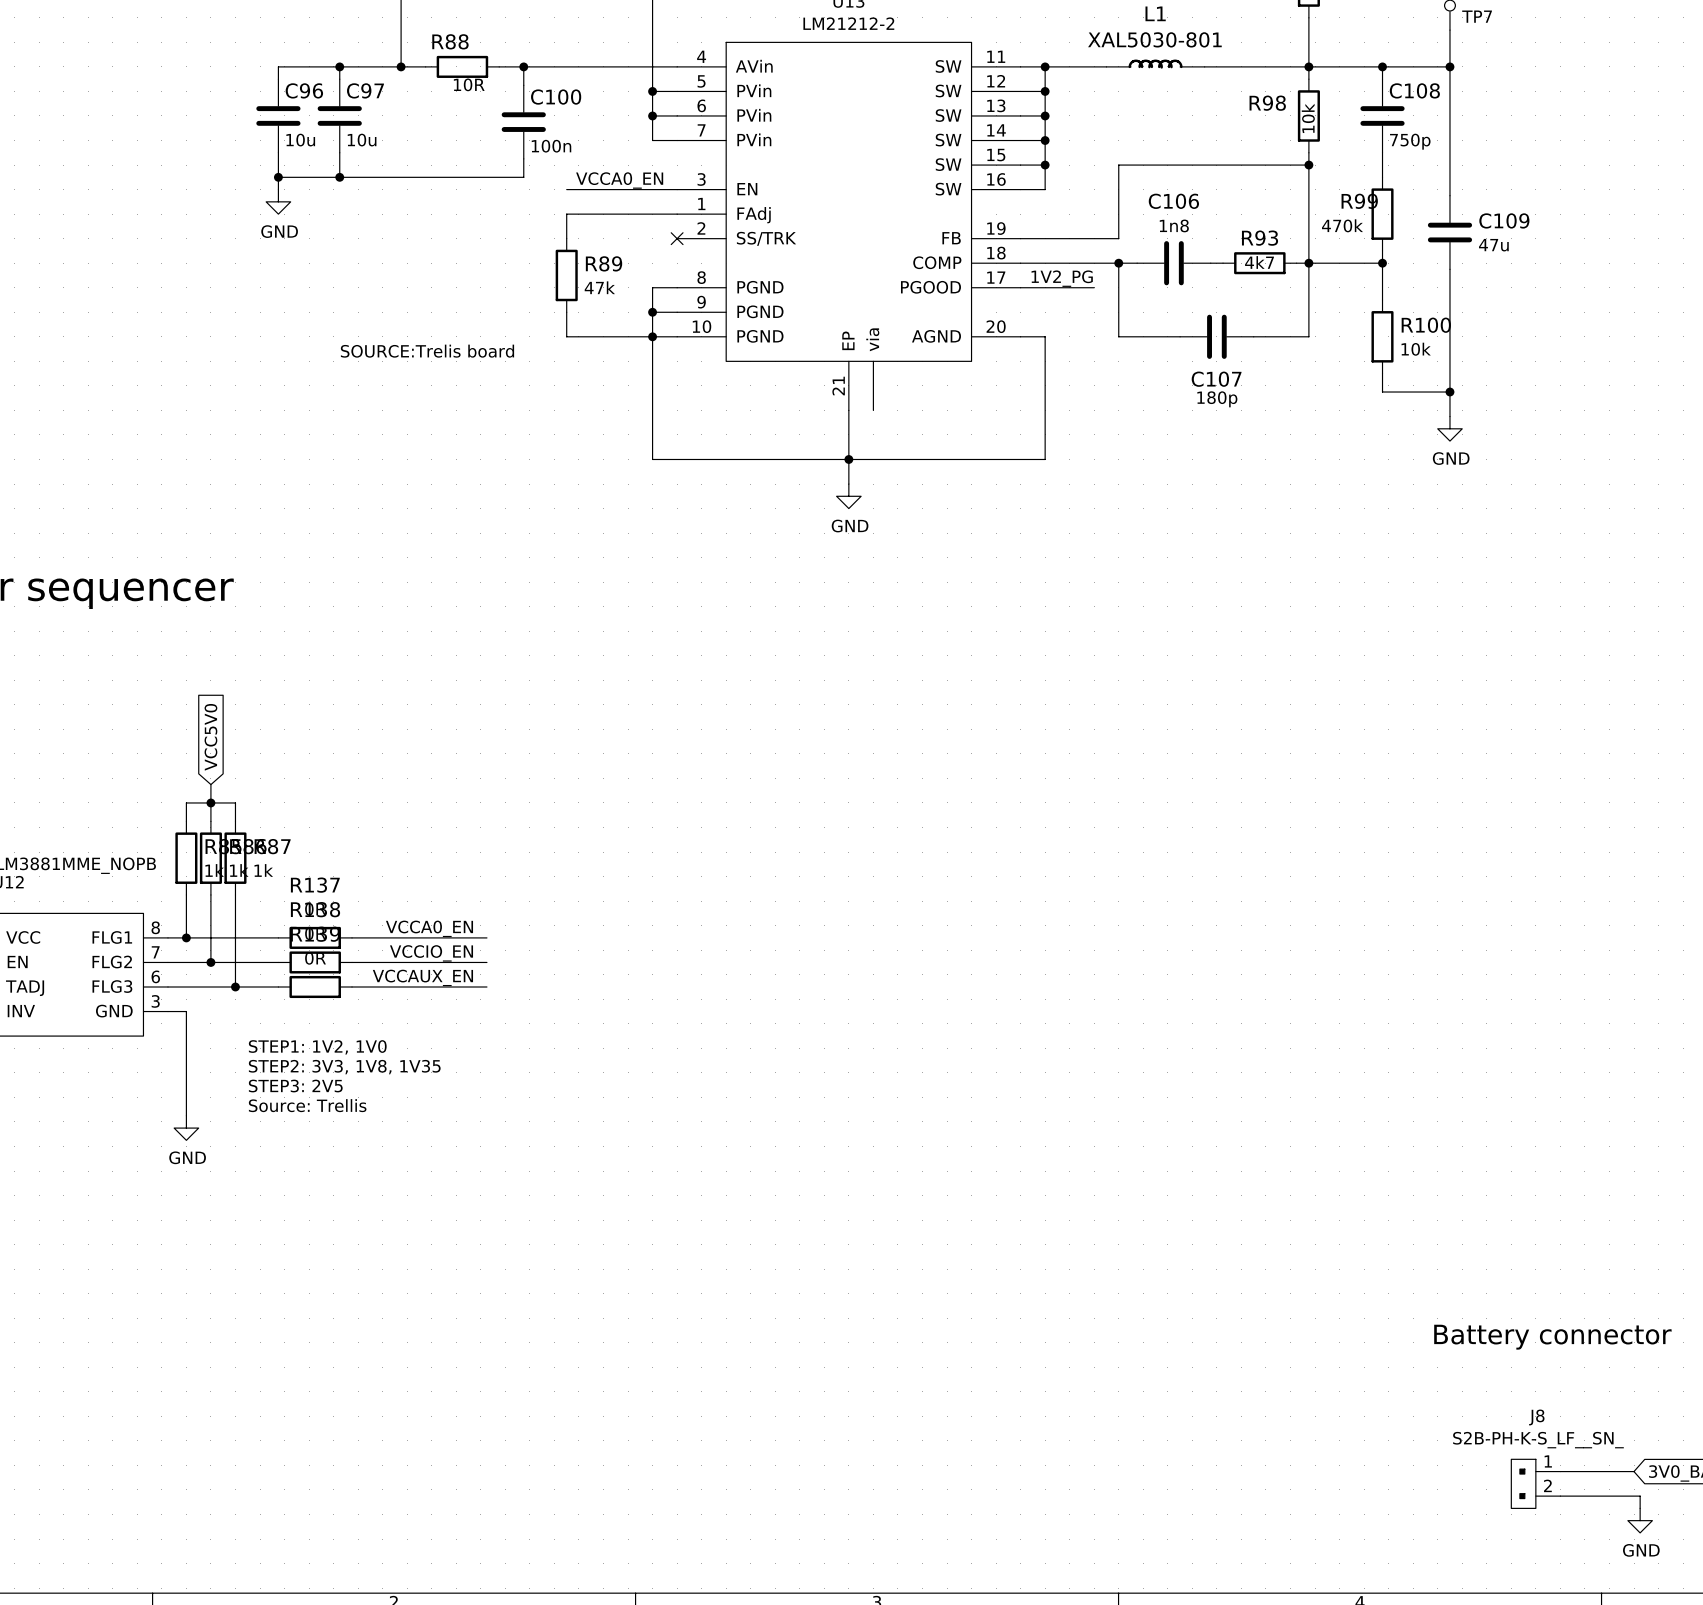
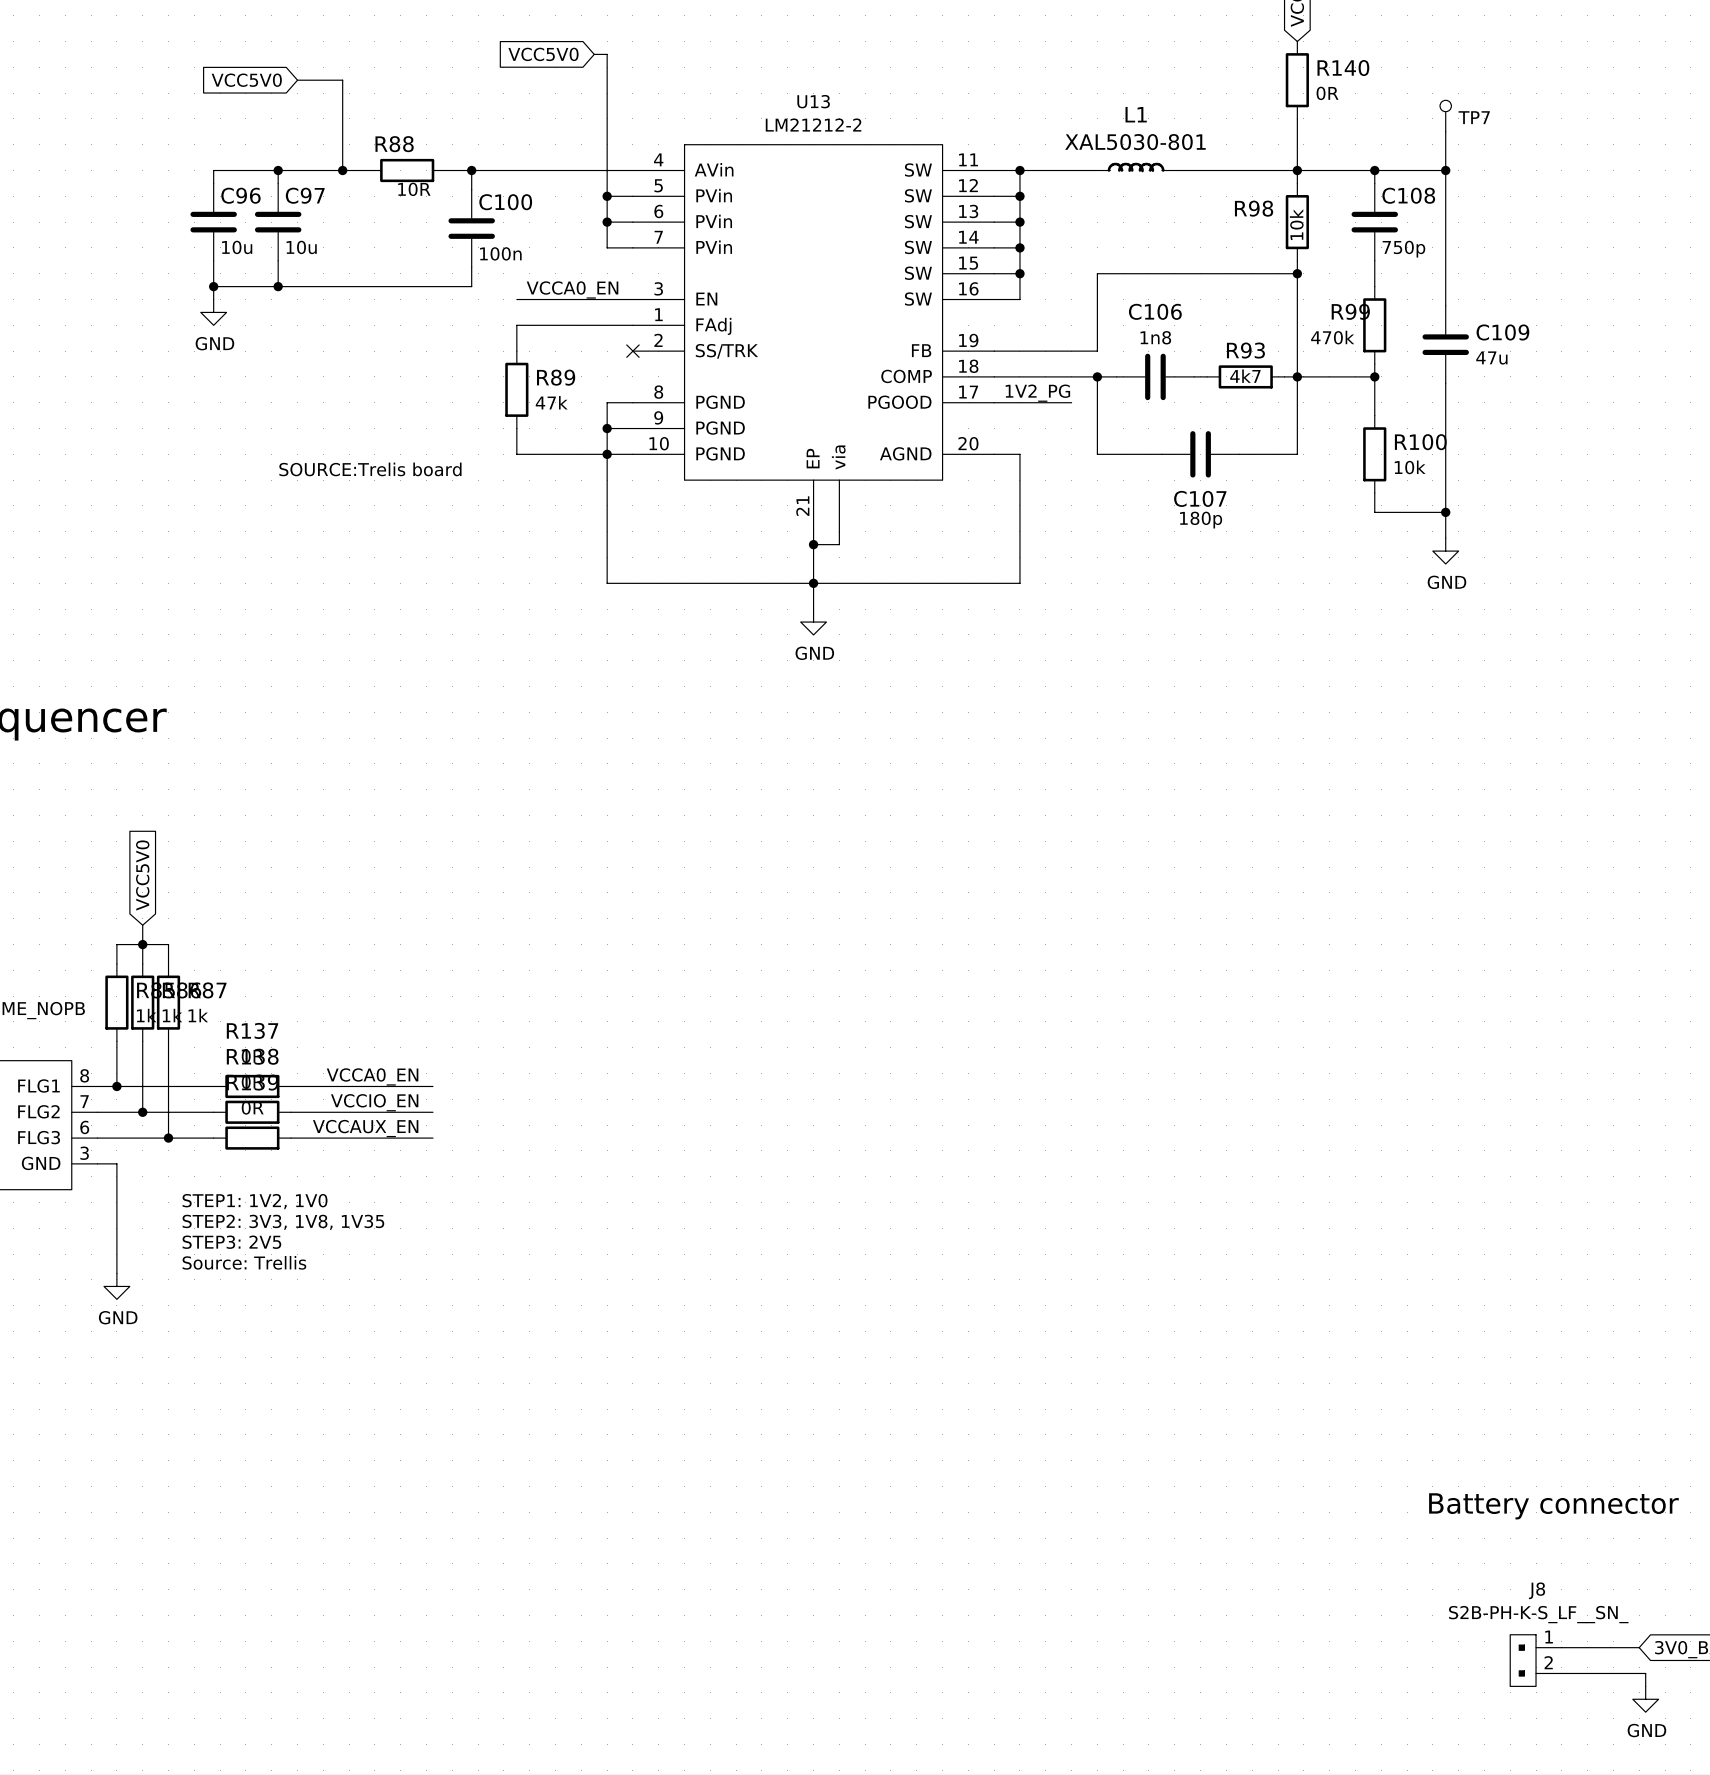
wire: none -> (839, 531) (839, 544) (813, 544)
junction: none -> (813, 544)

